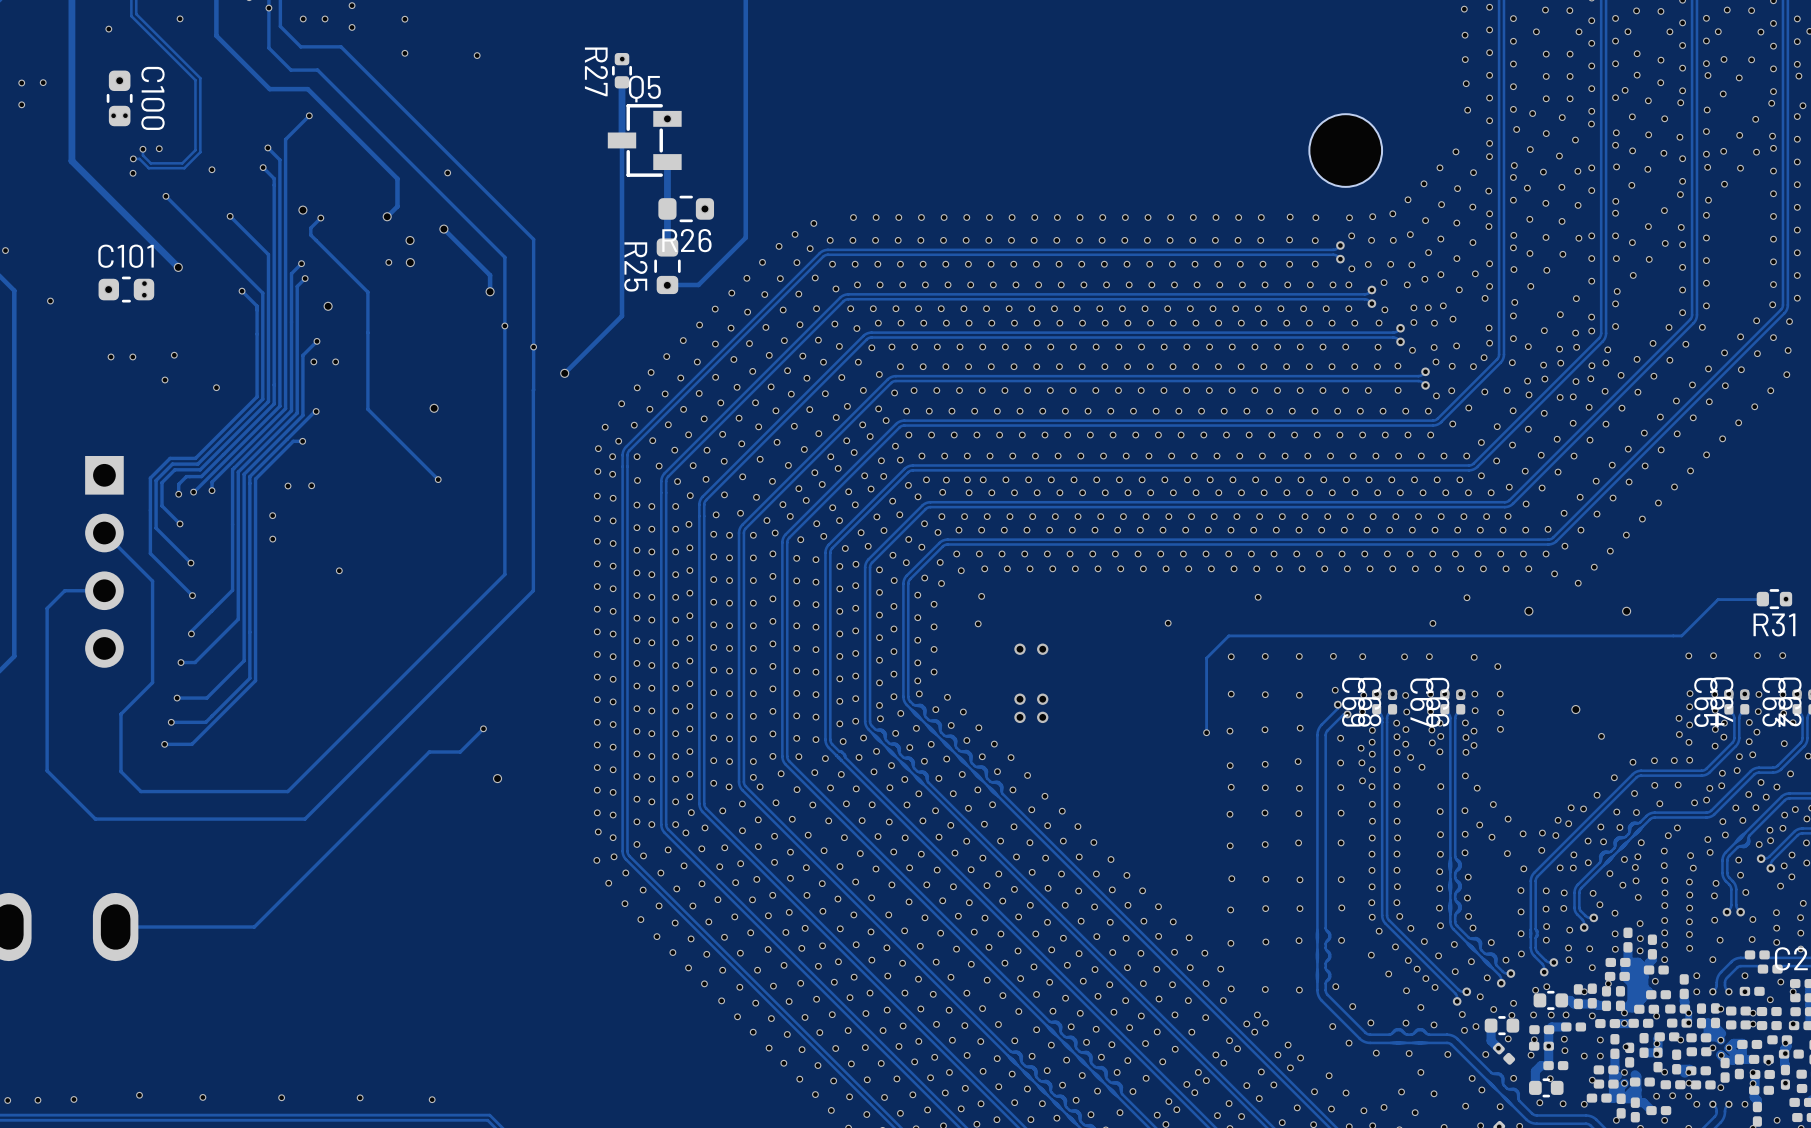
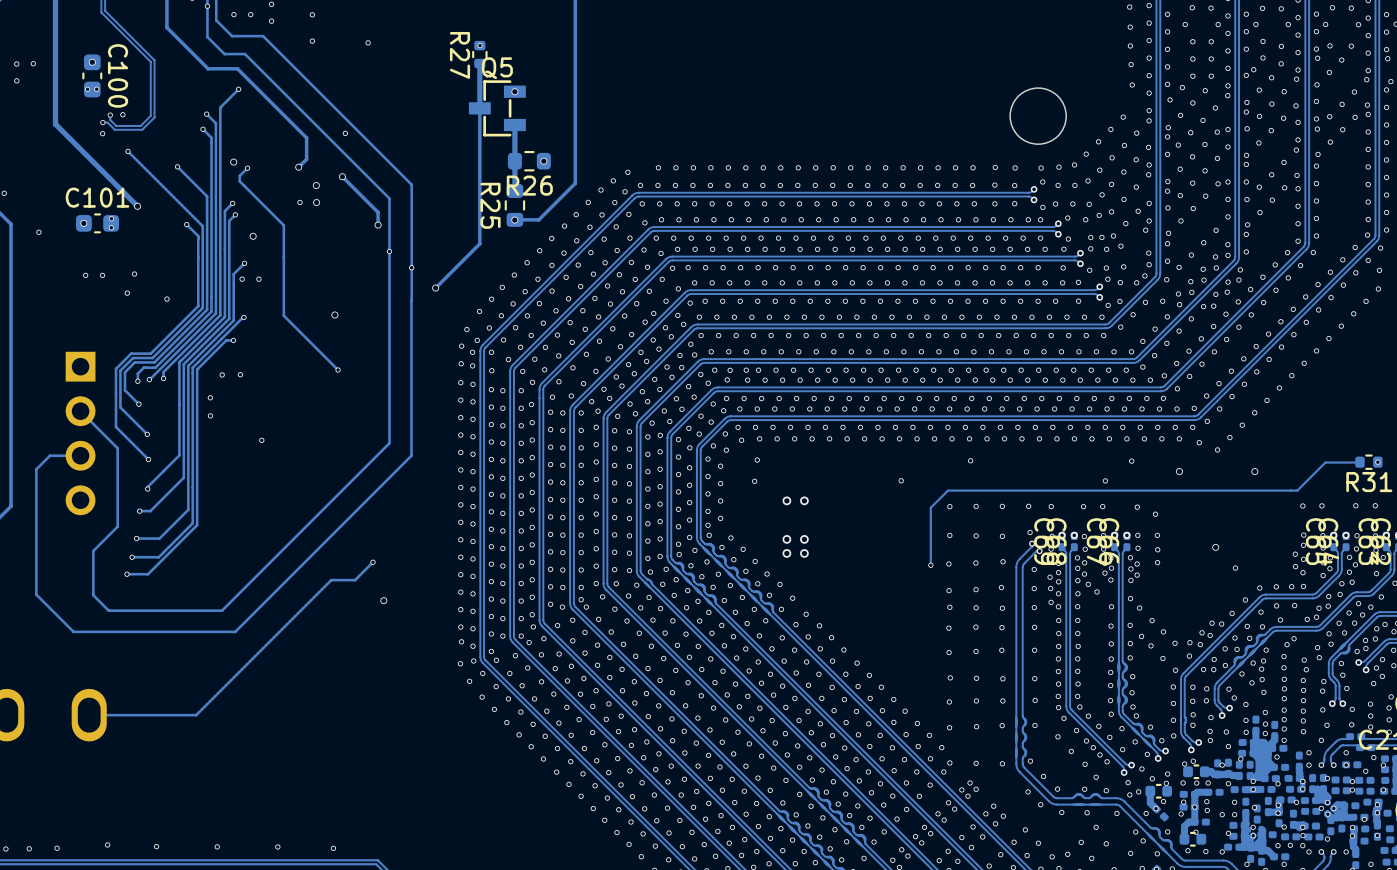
via: (180, 18) -> none
via: (108, 29) -> none
via: (211, 169) -> none

